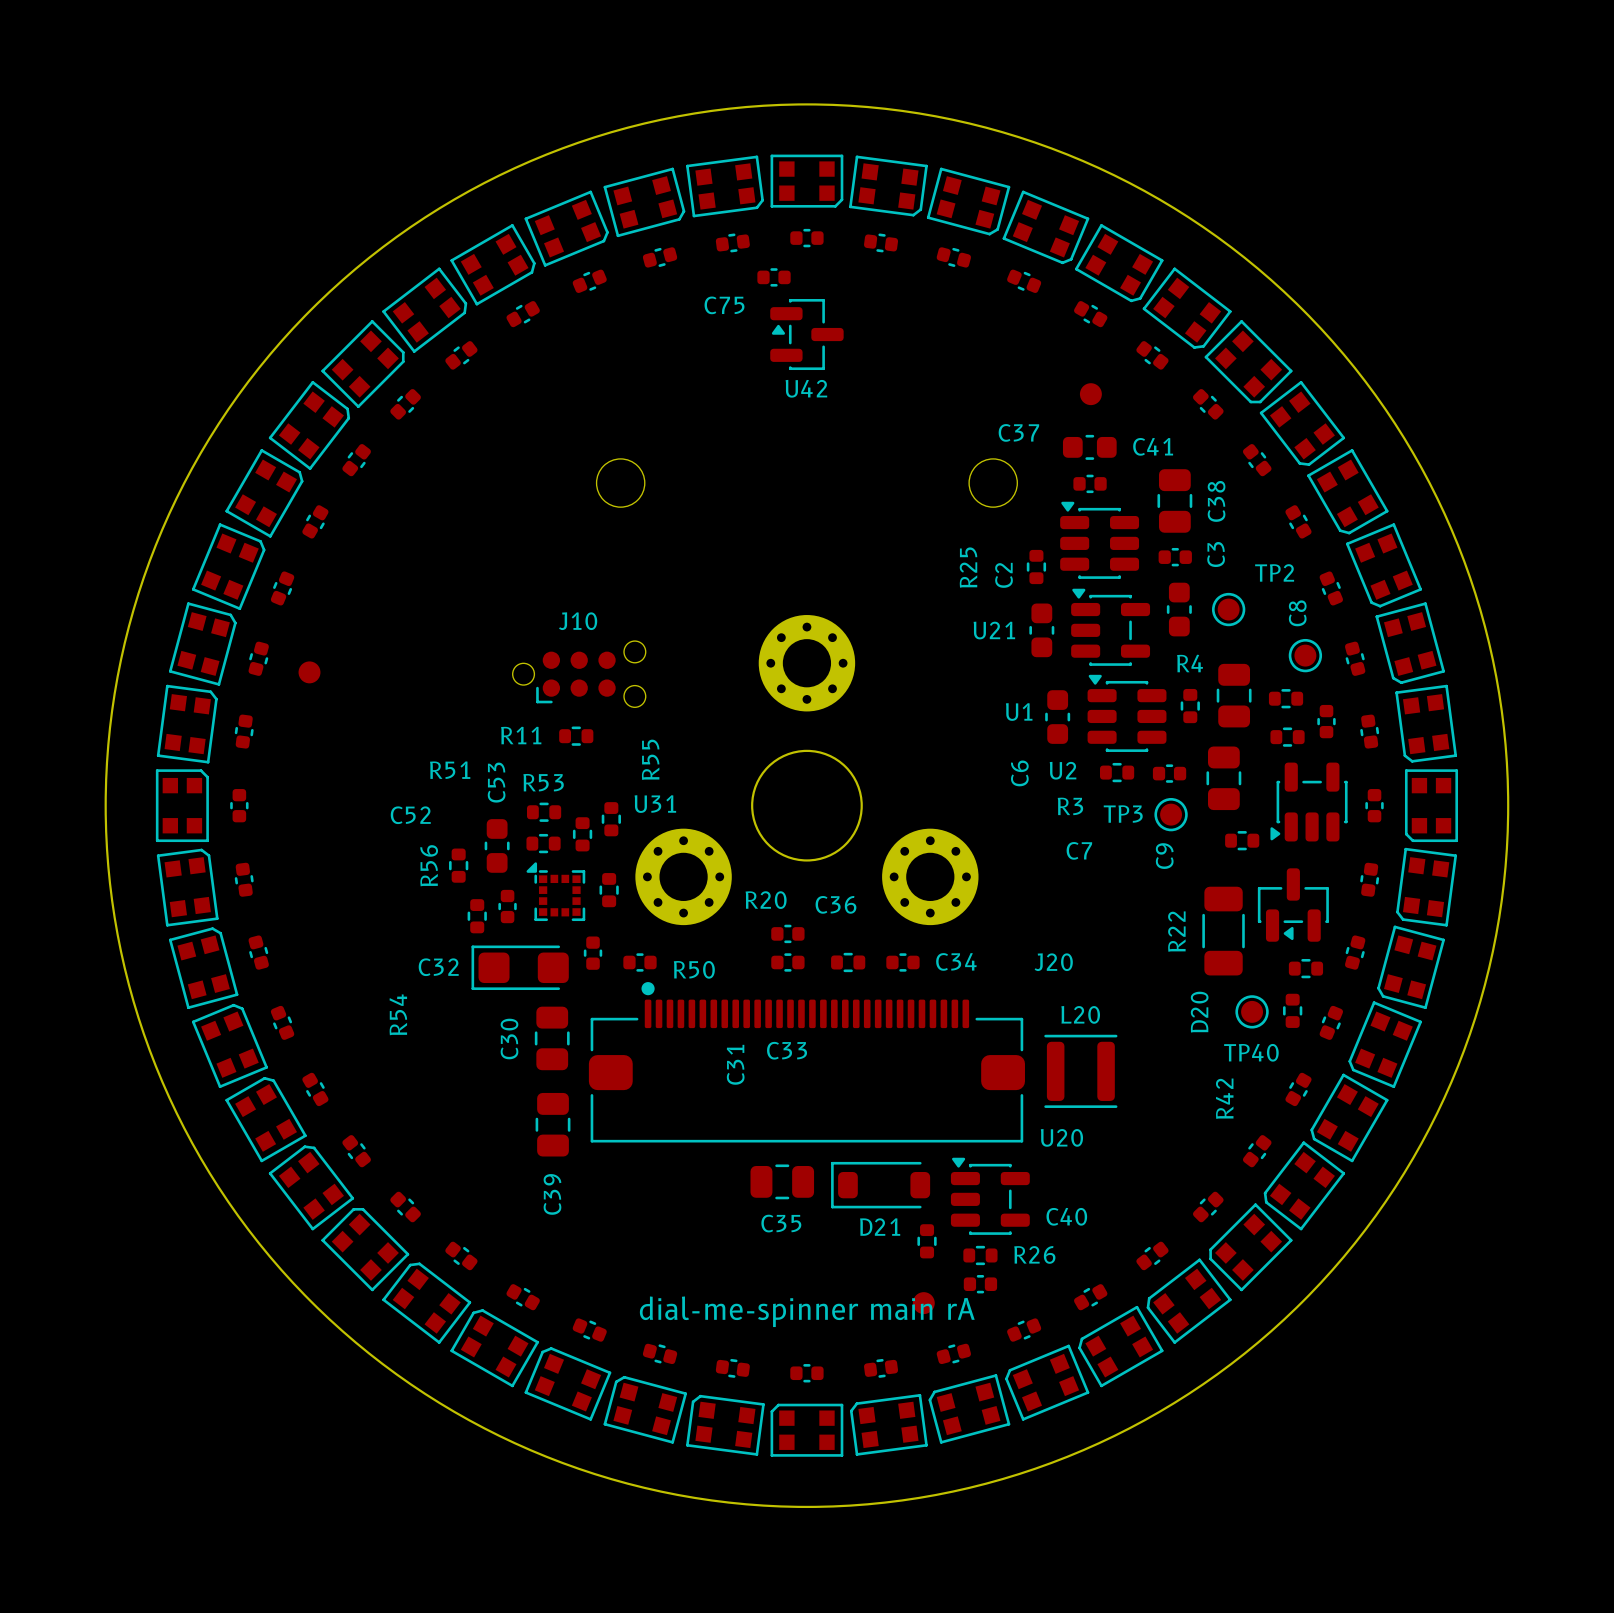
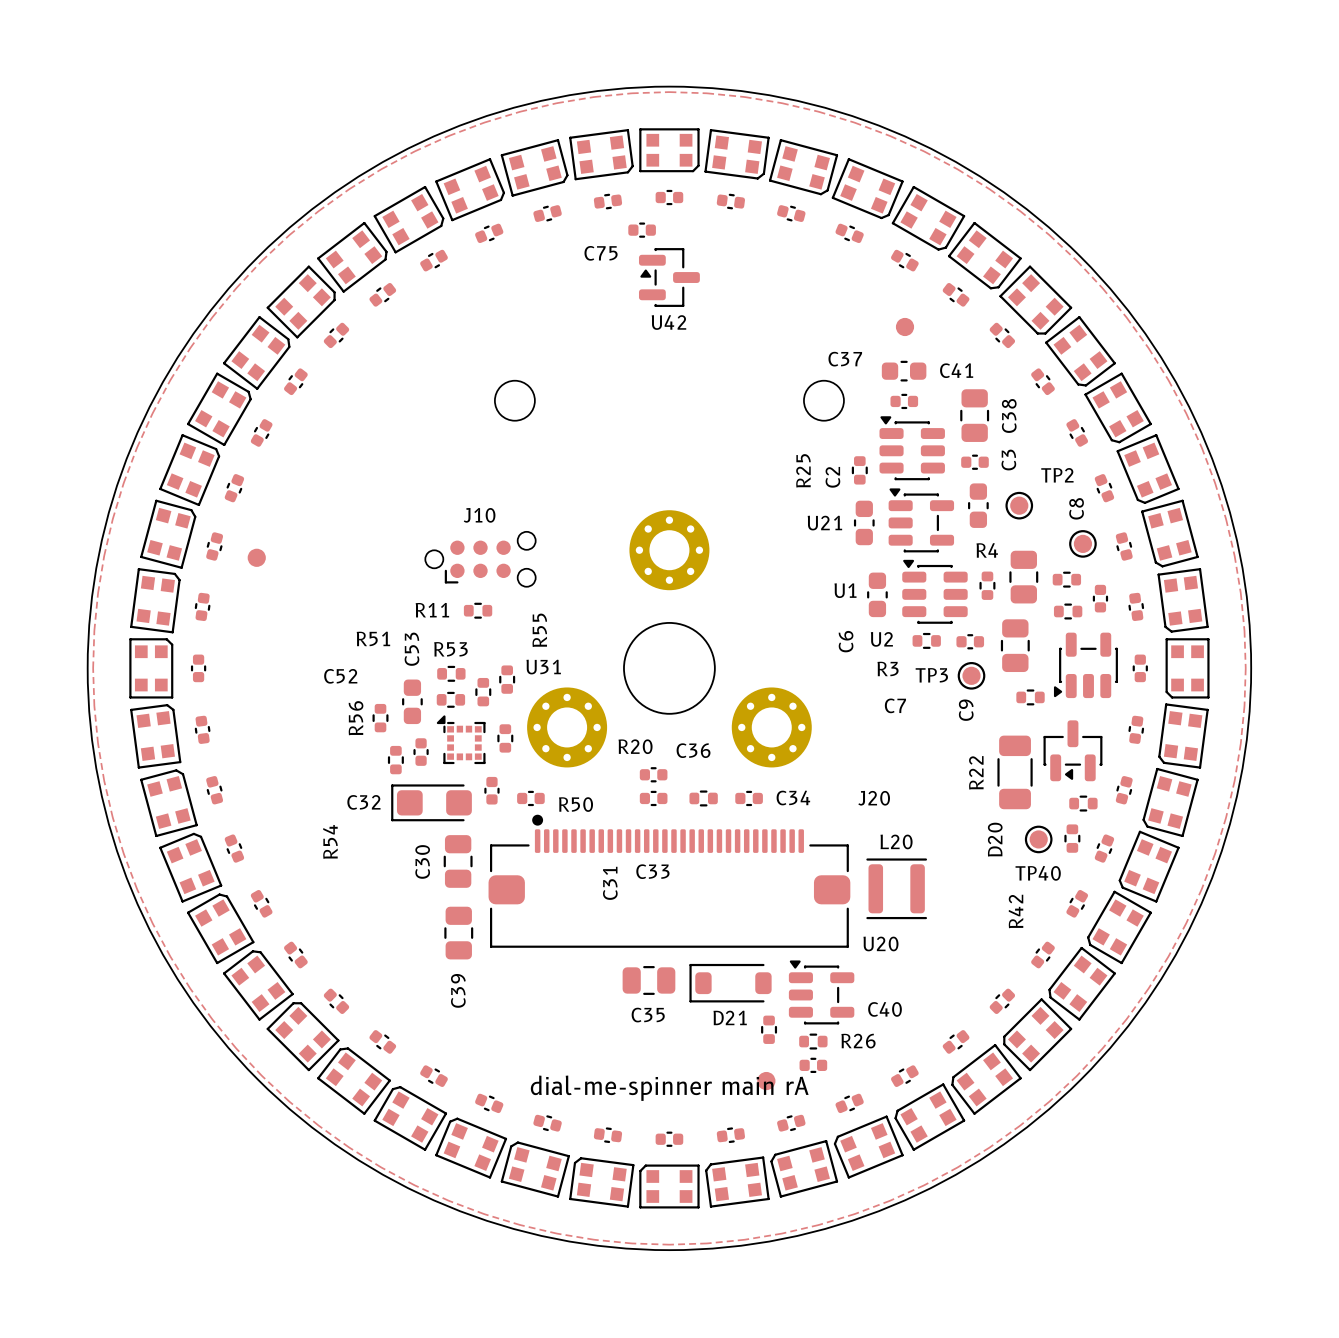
zone outline: none -> (669, 92) (594, 97) (557, 103) (484, 122) (448, 135) (381, 169) (349, 189) (289, 235) (261, 260) (236, 288) (190, 348) (170, 380) (137, 447) (123, 483) (104, 555) (98, 593) (93, 668) (98, 743) (104, 780) (123, 853) (137, 888) (170, 956) (190, 988) (236, 1048) (261, 1075) (289, 1101) (349, 1147) (381, 1167) (448, 1200) (484, 1214) (557, 1233) (594, 1239) (669, 1244) (744, 1239) (781, 1233) (854, 1214) (889, 1200) (957, 1167) (989, 1147) (1049, 1101) (1076, 1075) (1102, 1048) (1148, 988) (1168, 956) (1201, 888) (1215, 853) (1234, 780) (1240, 743) (1245, 668) (1240, 593) (1234, 555) (1215, 483) (1201, 447) (1168, 380) (1148, 348) (1102, 288) (1076, 260) (1049, 235) (989, 189) (957, 169) (889, 135) (854, 122) (781, 103) (744, 97) (669, 92)

